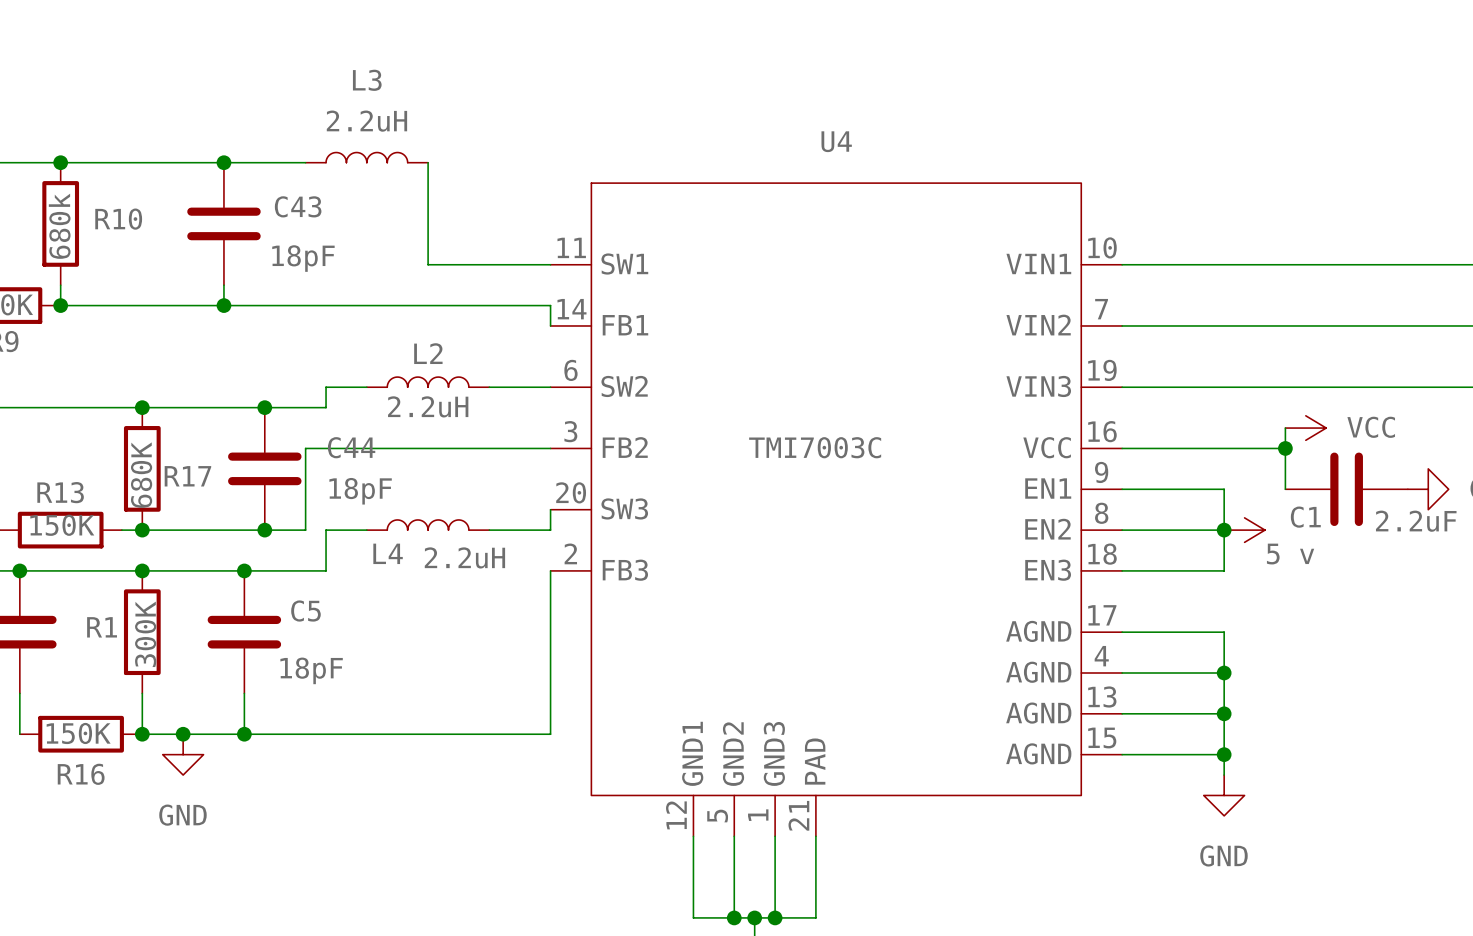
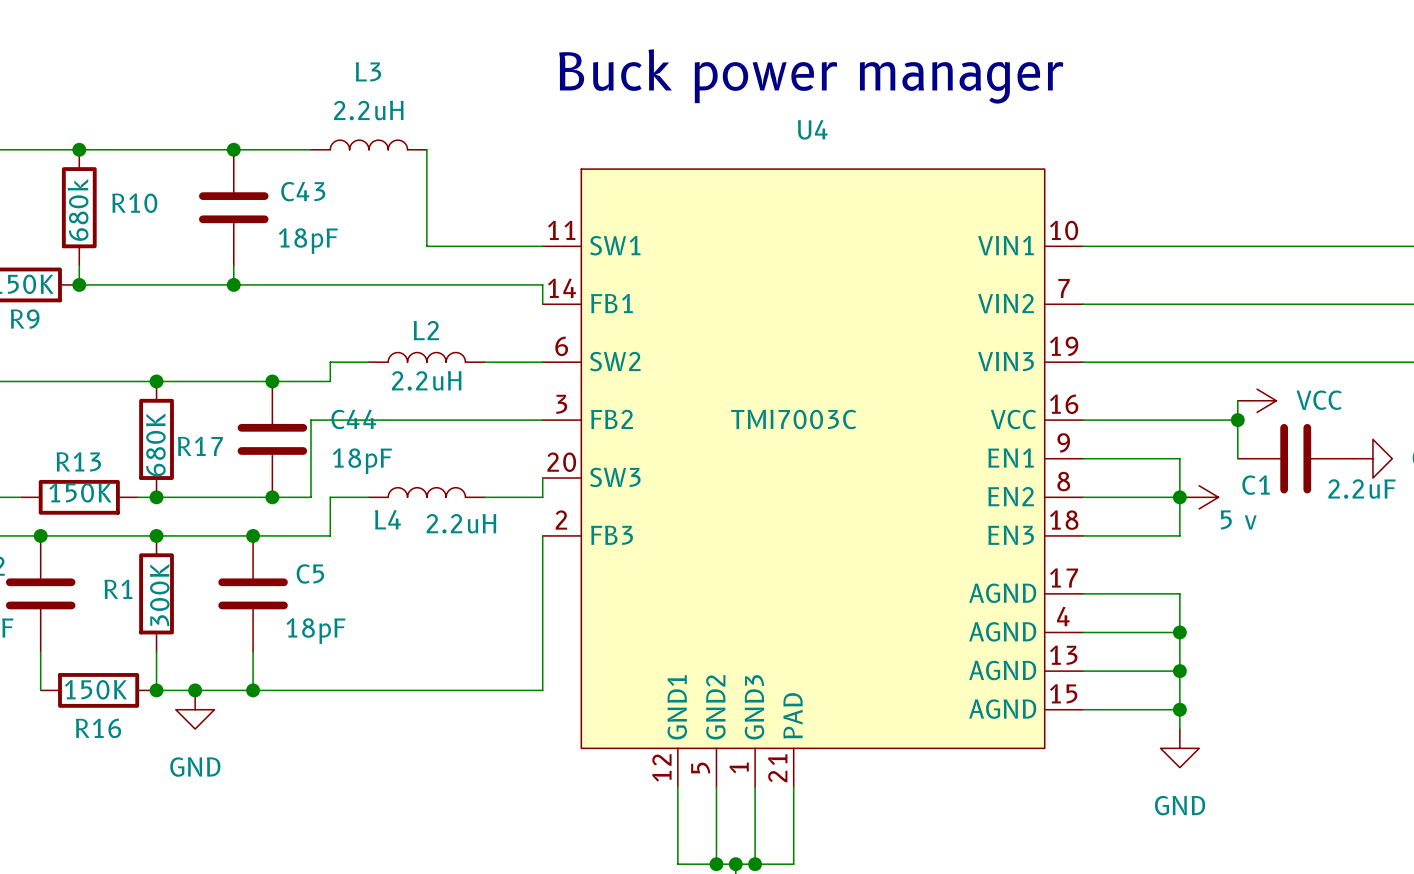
text: none -> Buck power manager (811, 76)

